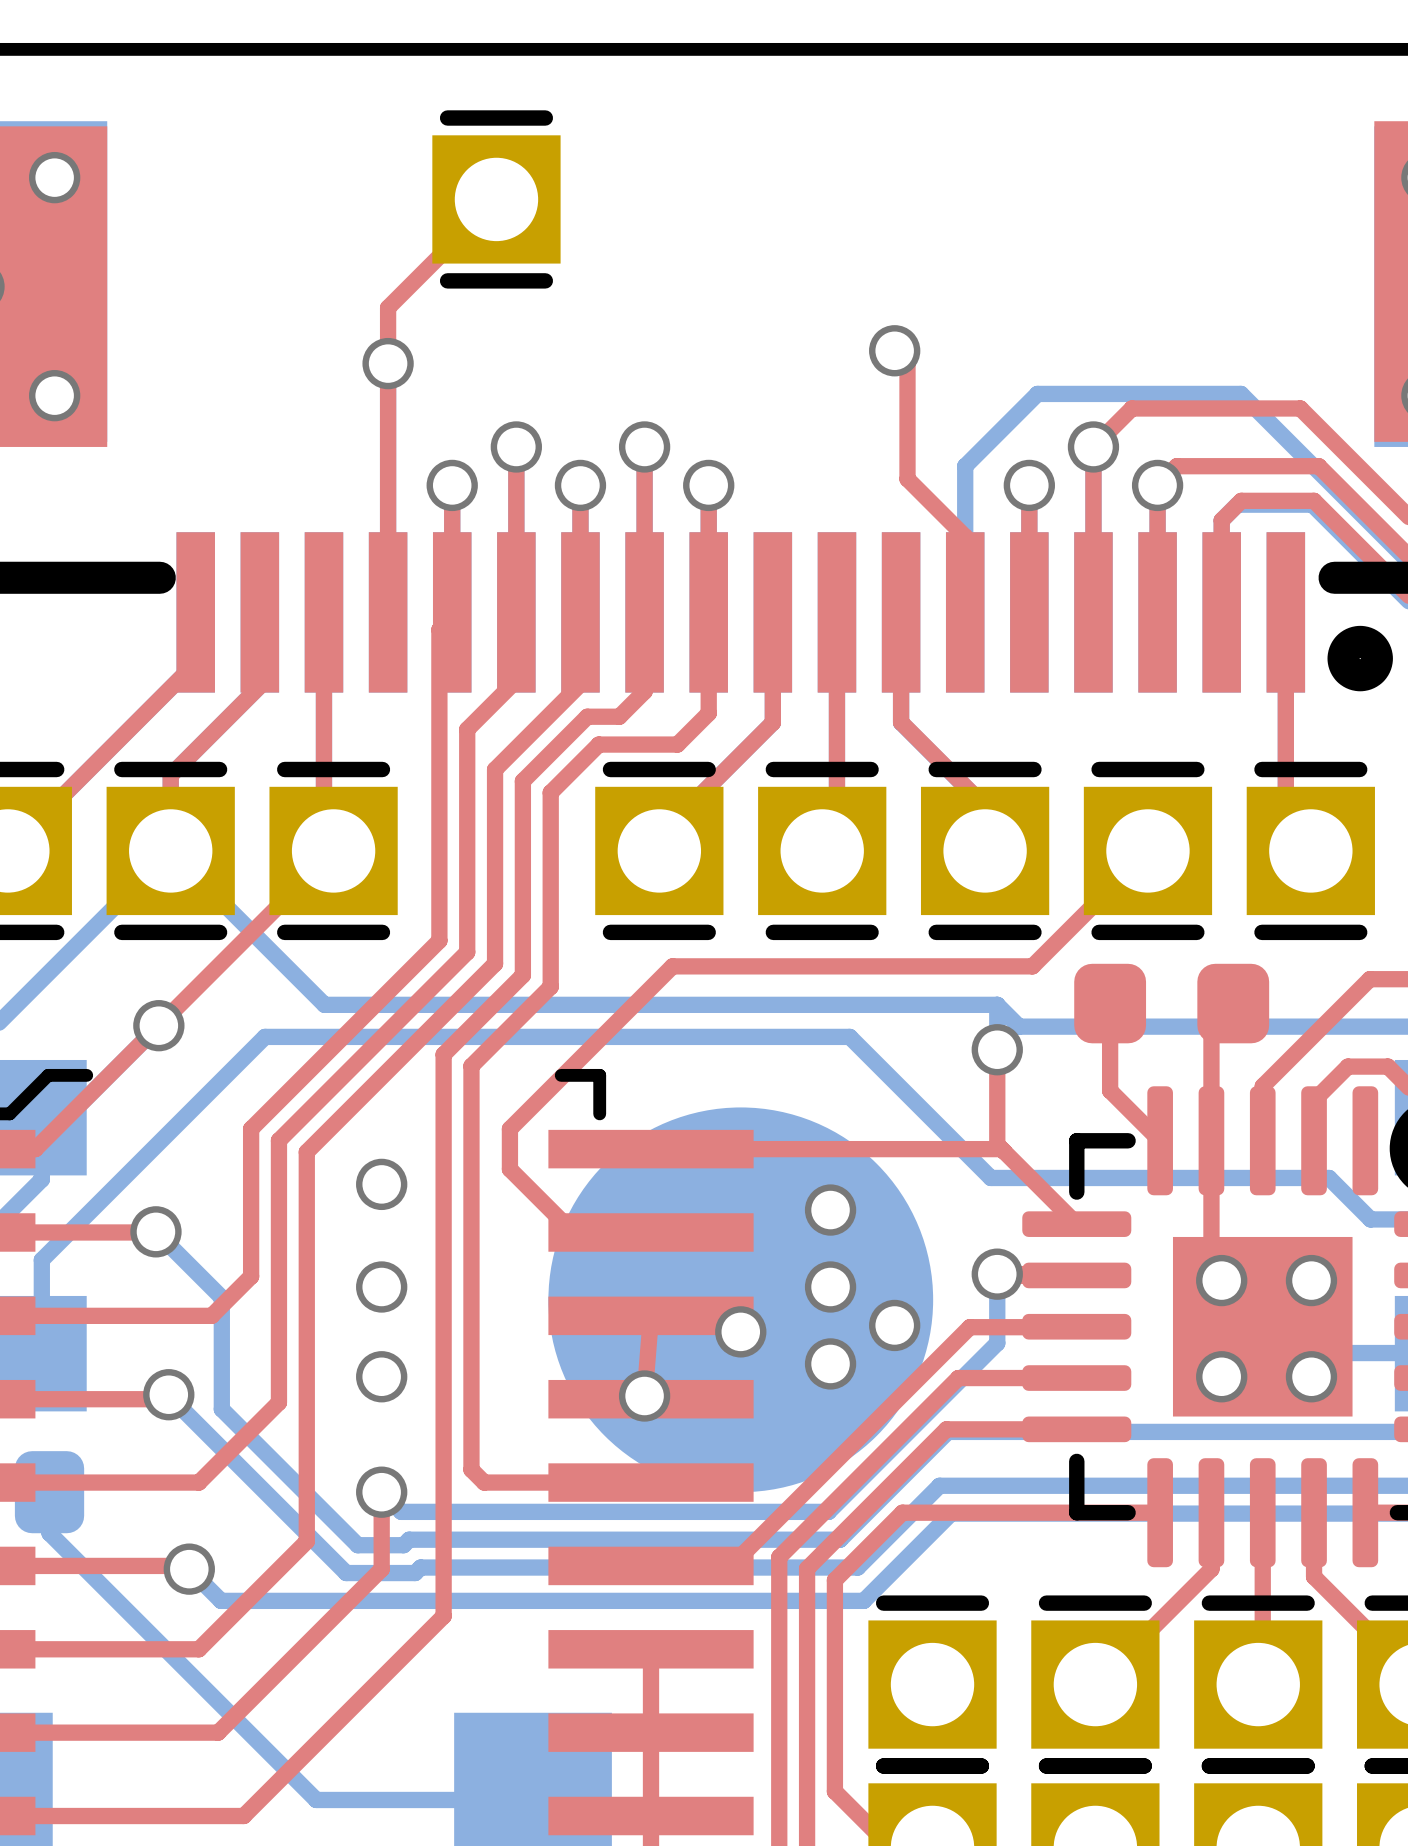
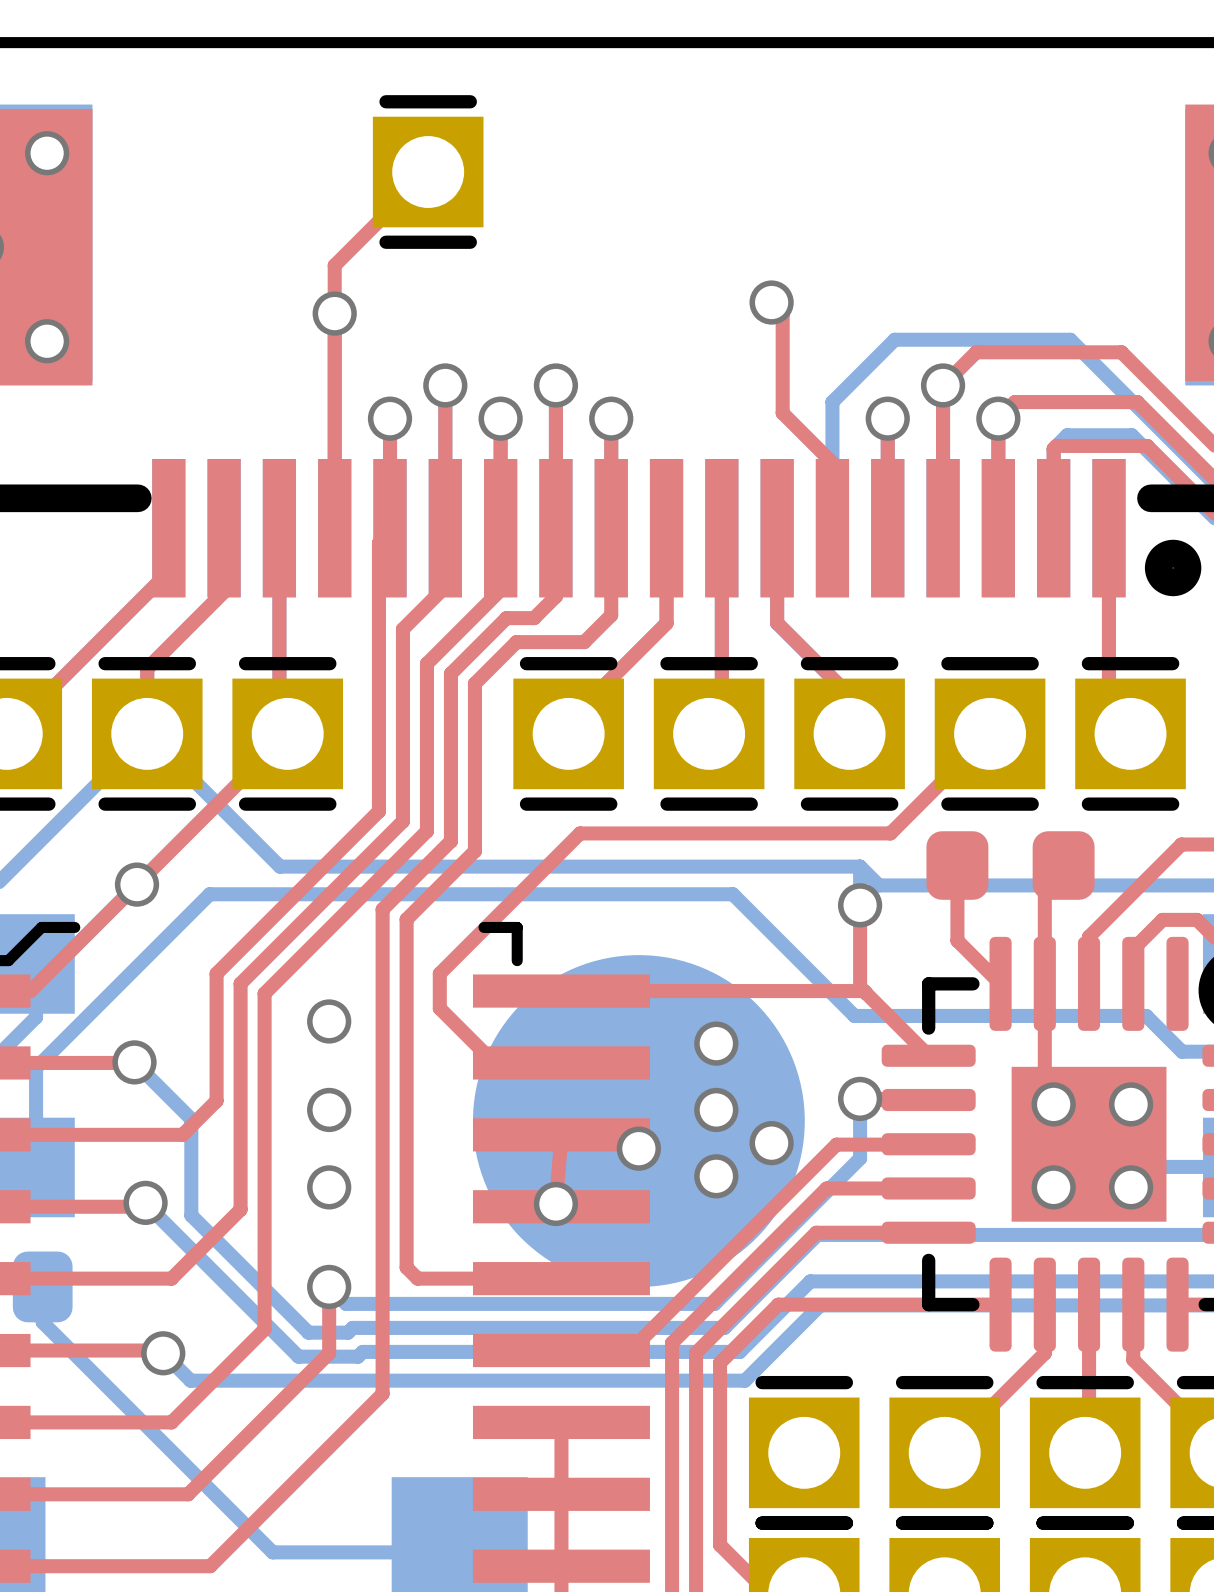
top track: (1225, 517) (1241, 500) (1314, 500) (1330, 517) -> (1056, 445) (1147, 445)
bottom track: (264, 1036) (41, 1260) -> (228, 894) (209, 894) (36, 1067) (36, 1086)

